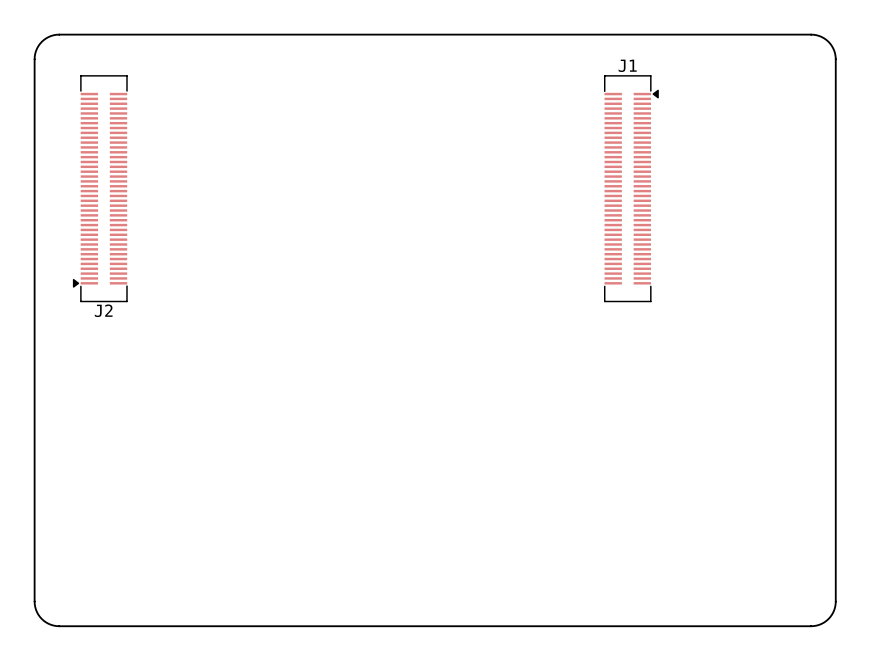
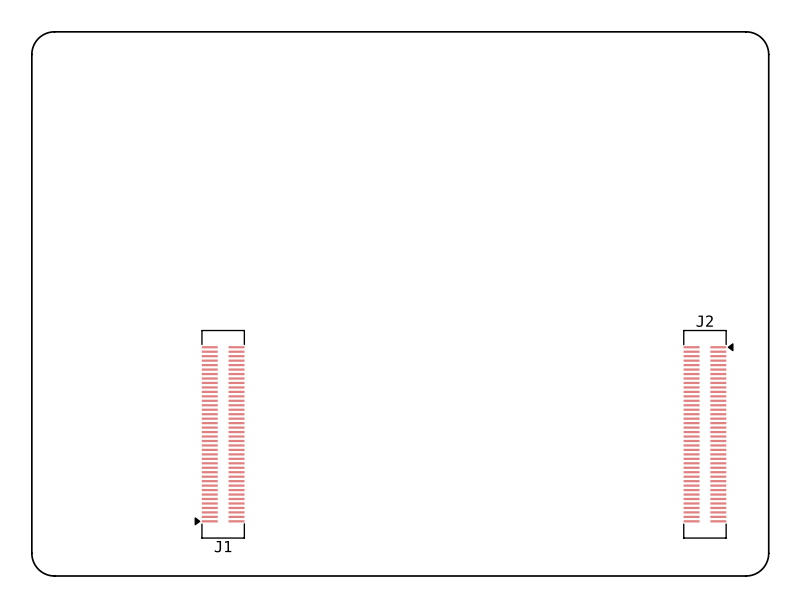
J2 rotation: 0° (100, 188) -> 180° (708, 434)
J2 position: (100, 188) -> (708, 434)
J1 rotation: 0° (631, 188) -> 180° (219, 434)
J1 position: (631, 188) -> (219, 434)

